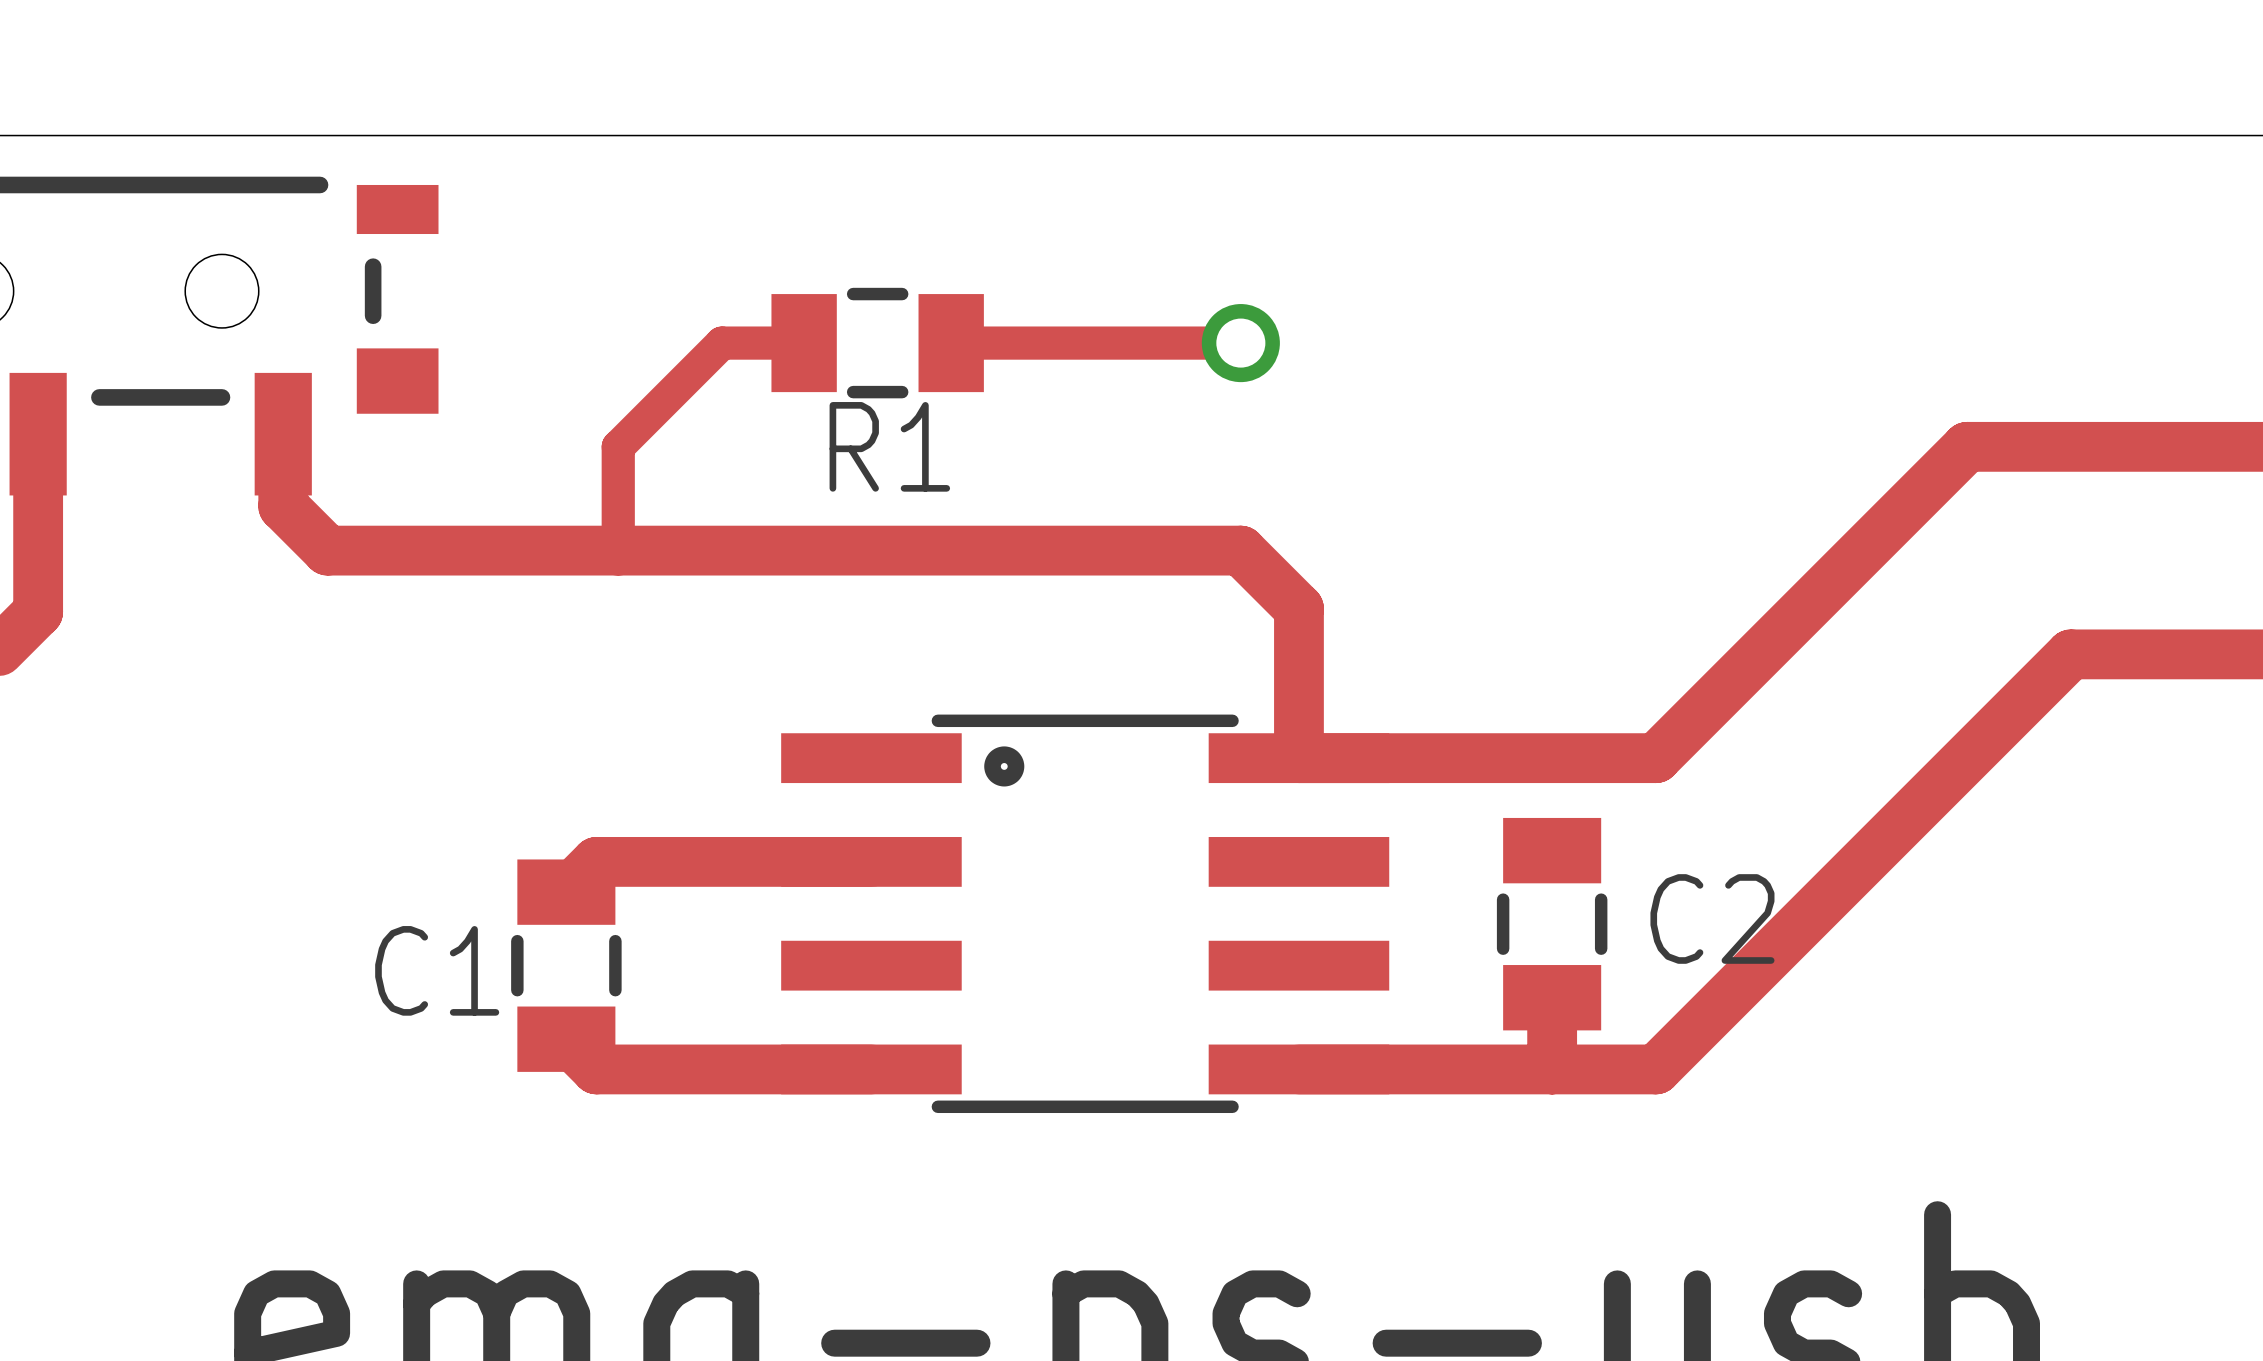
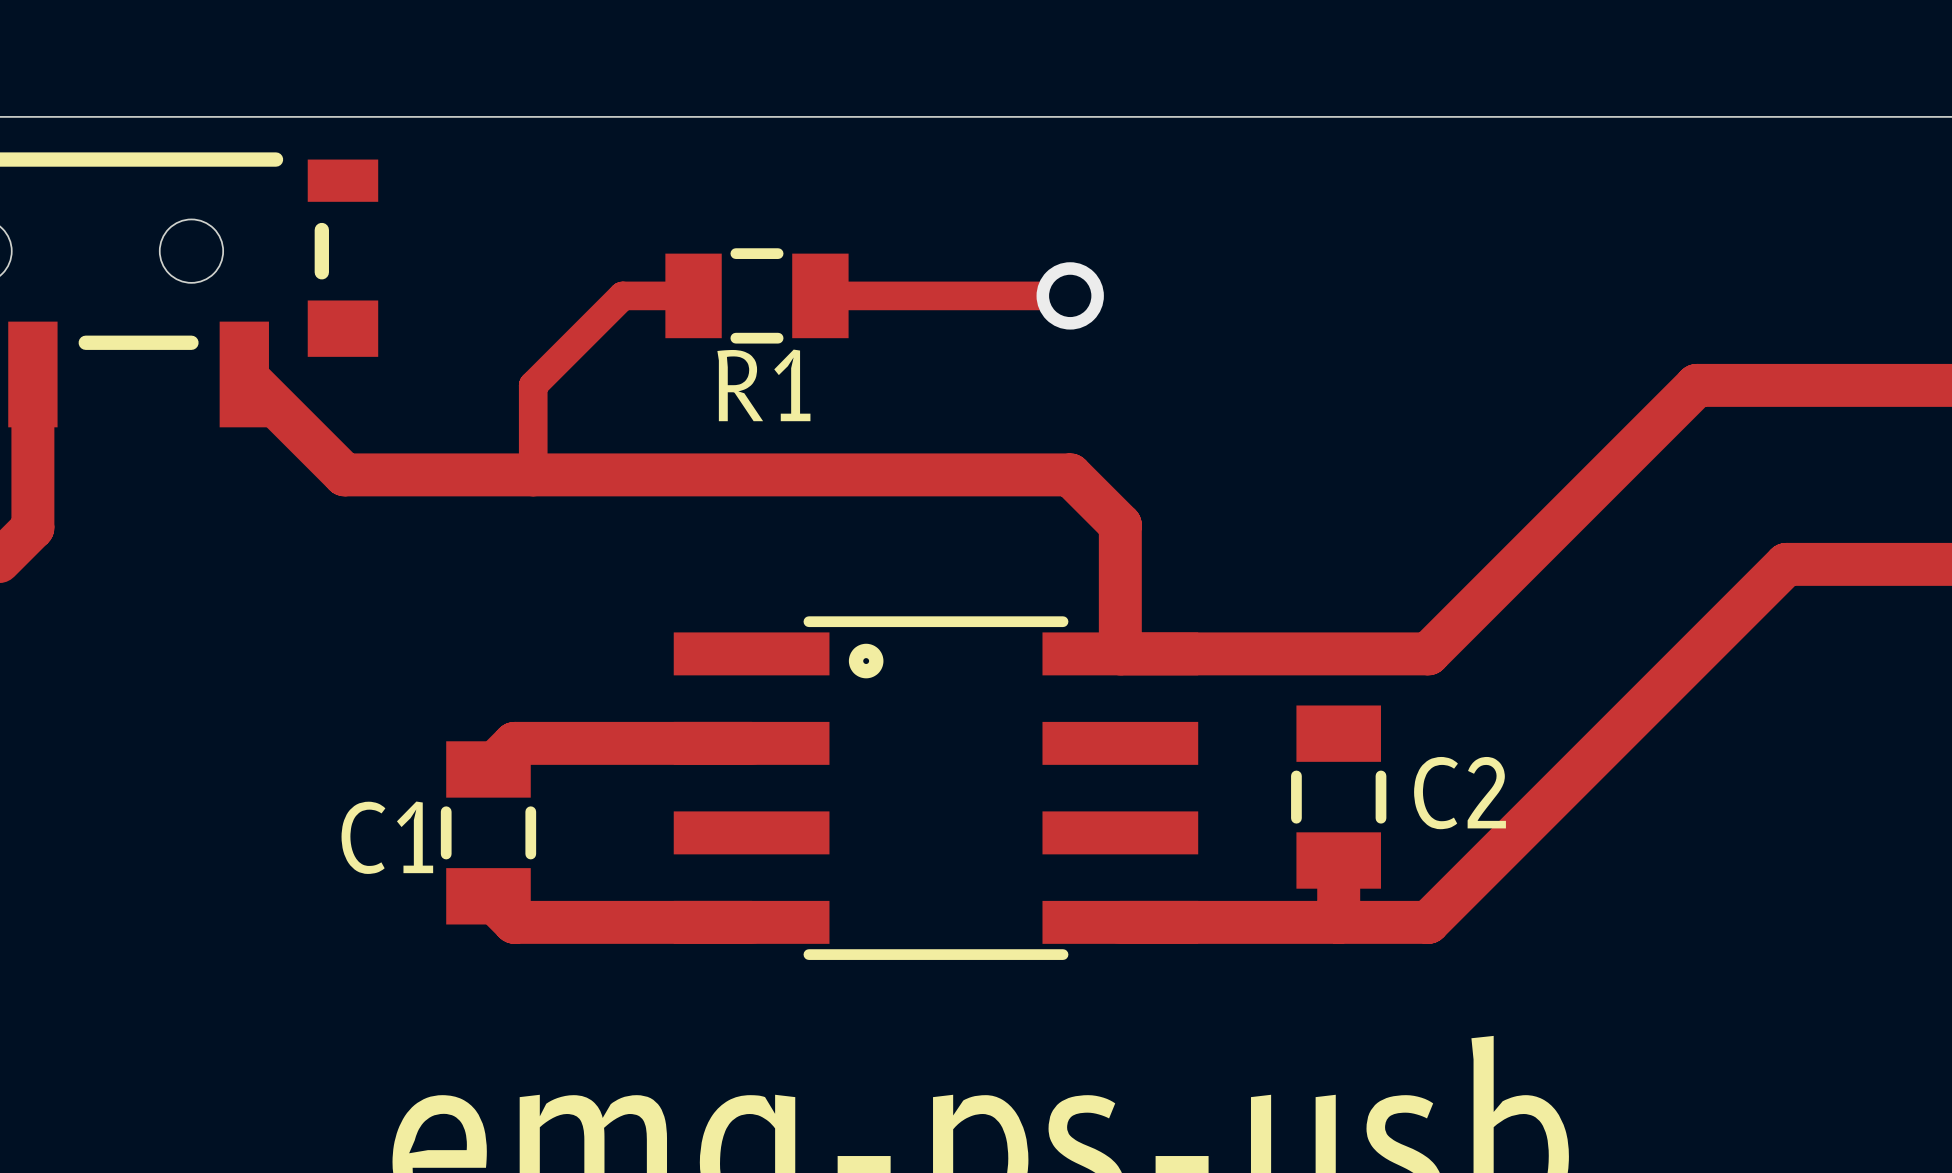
track: (283, 434) (283, 506) (327, 550) (399, 550) -> (244, 374) (344, 474)

